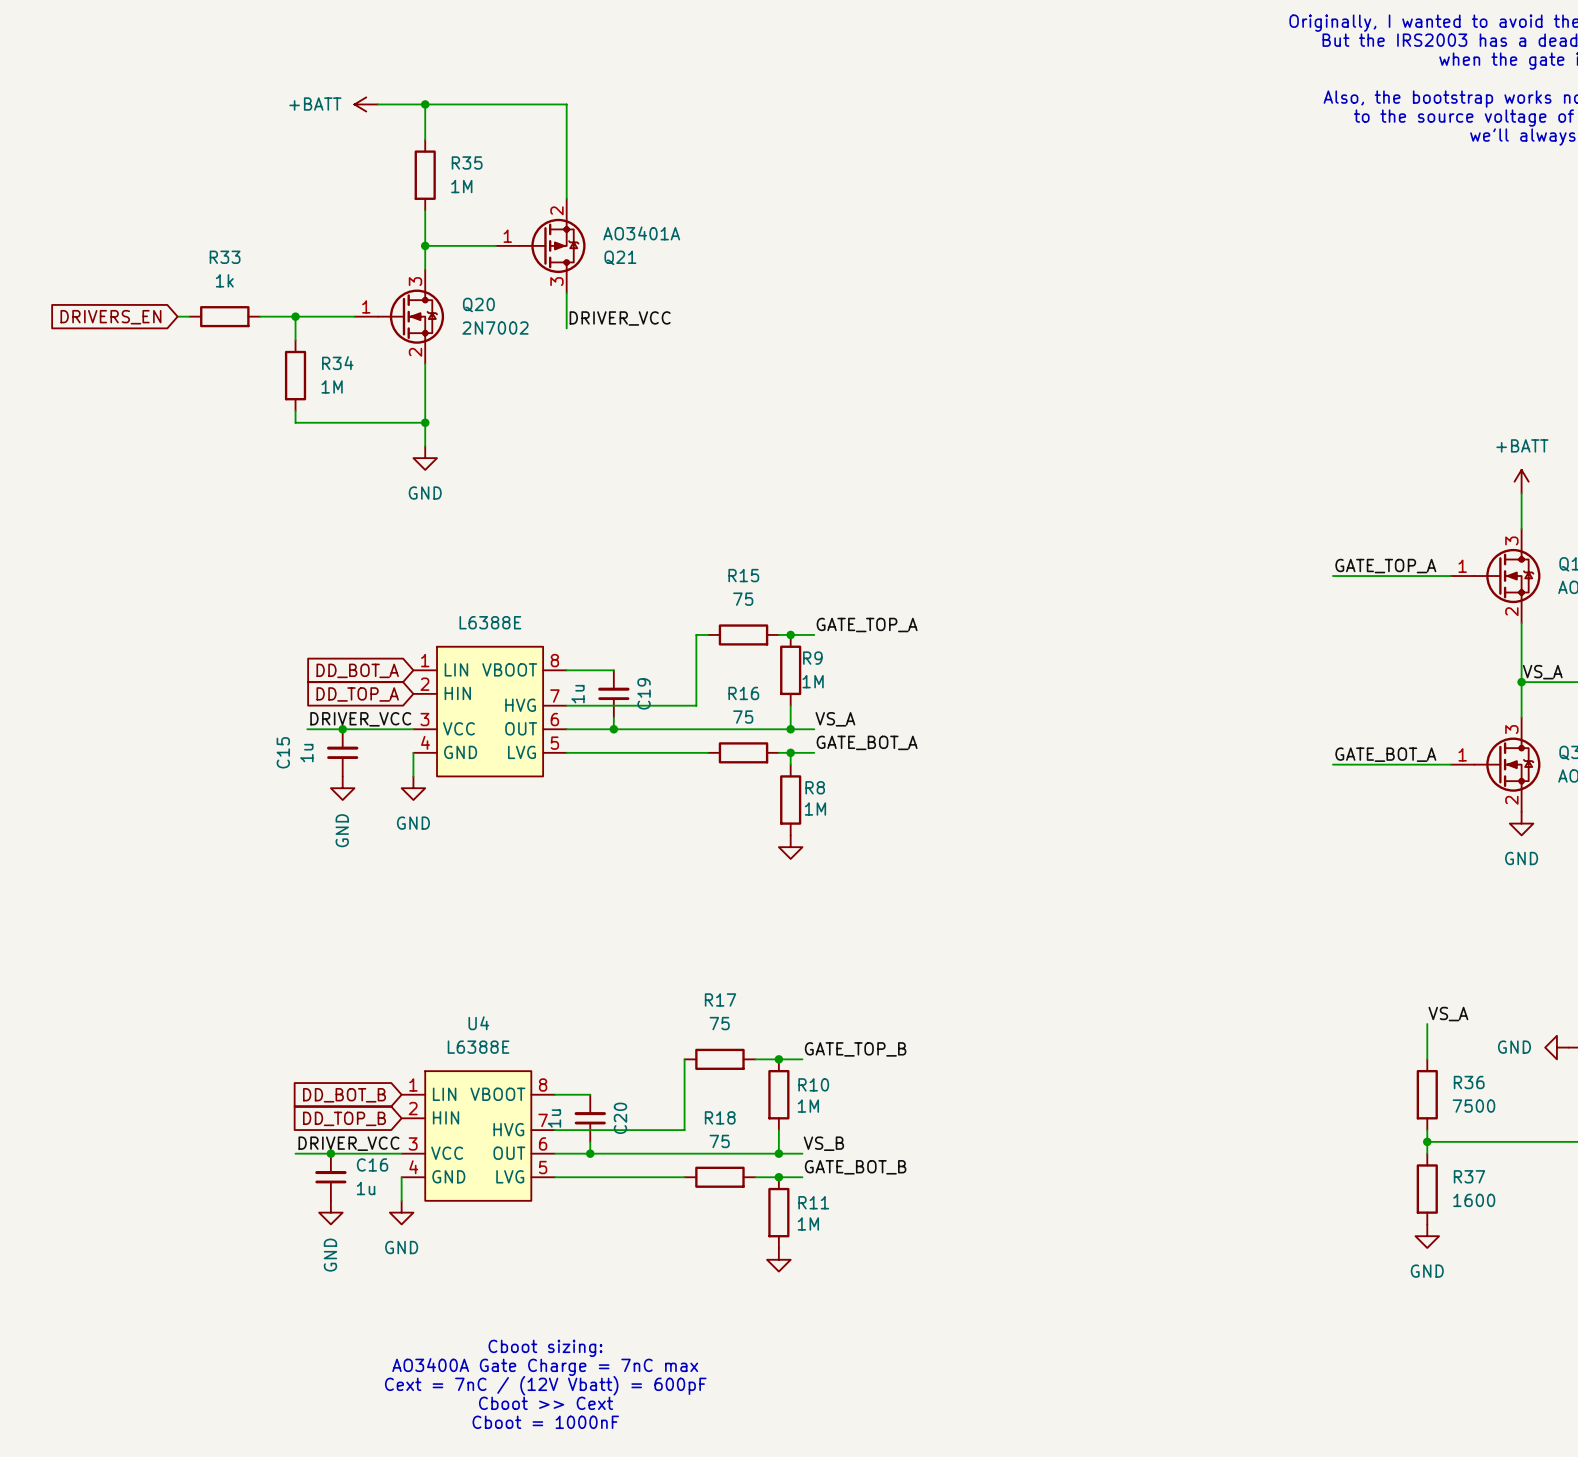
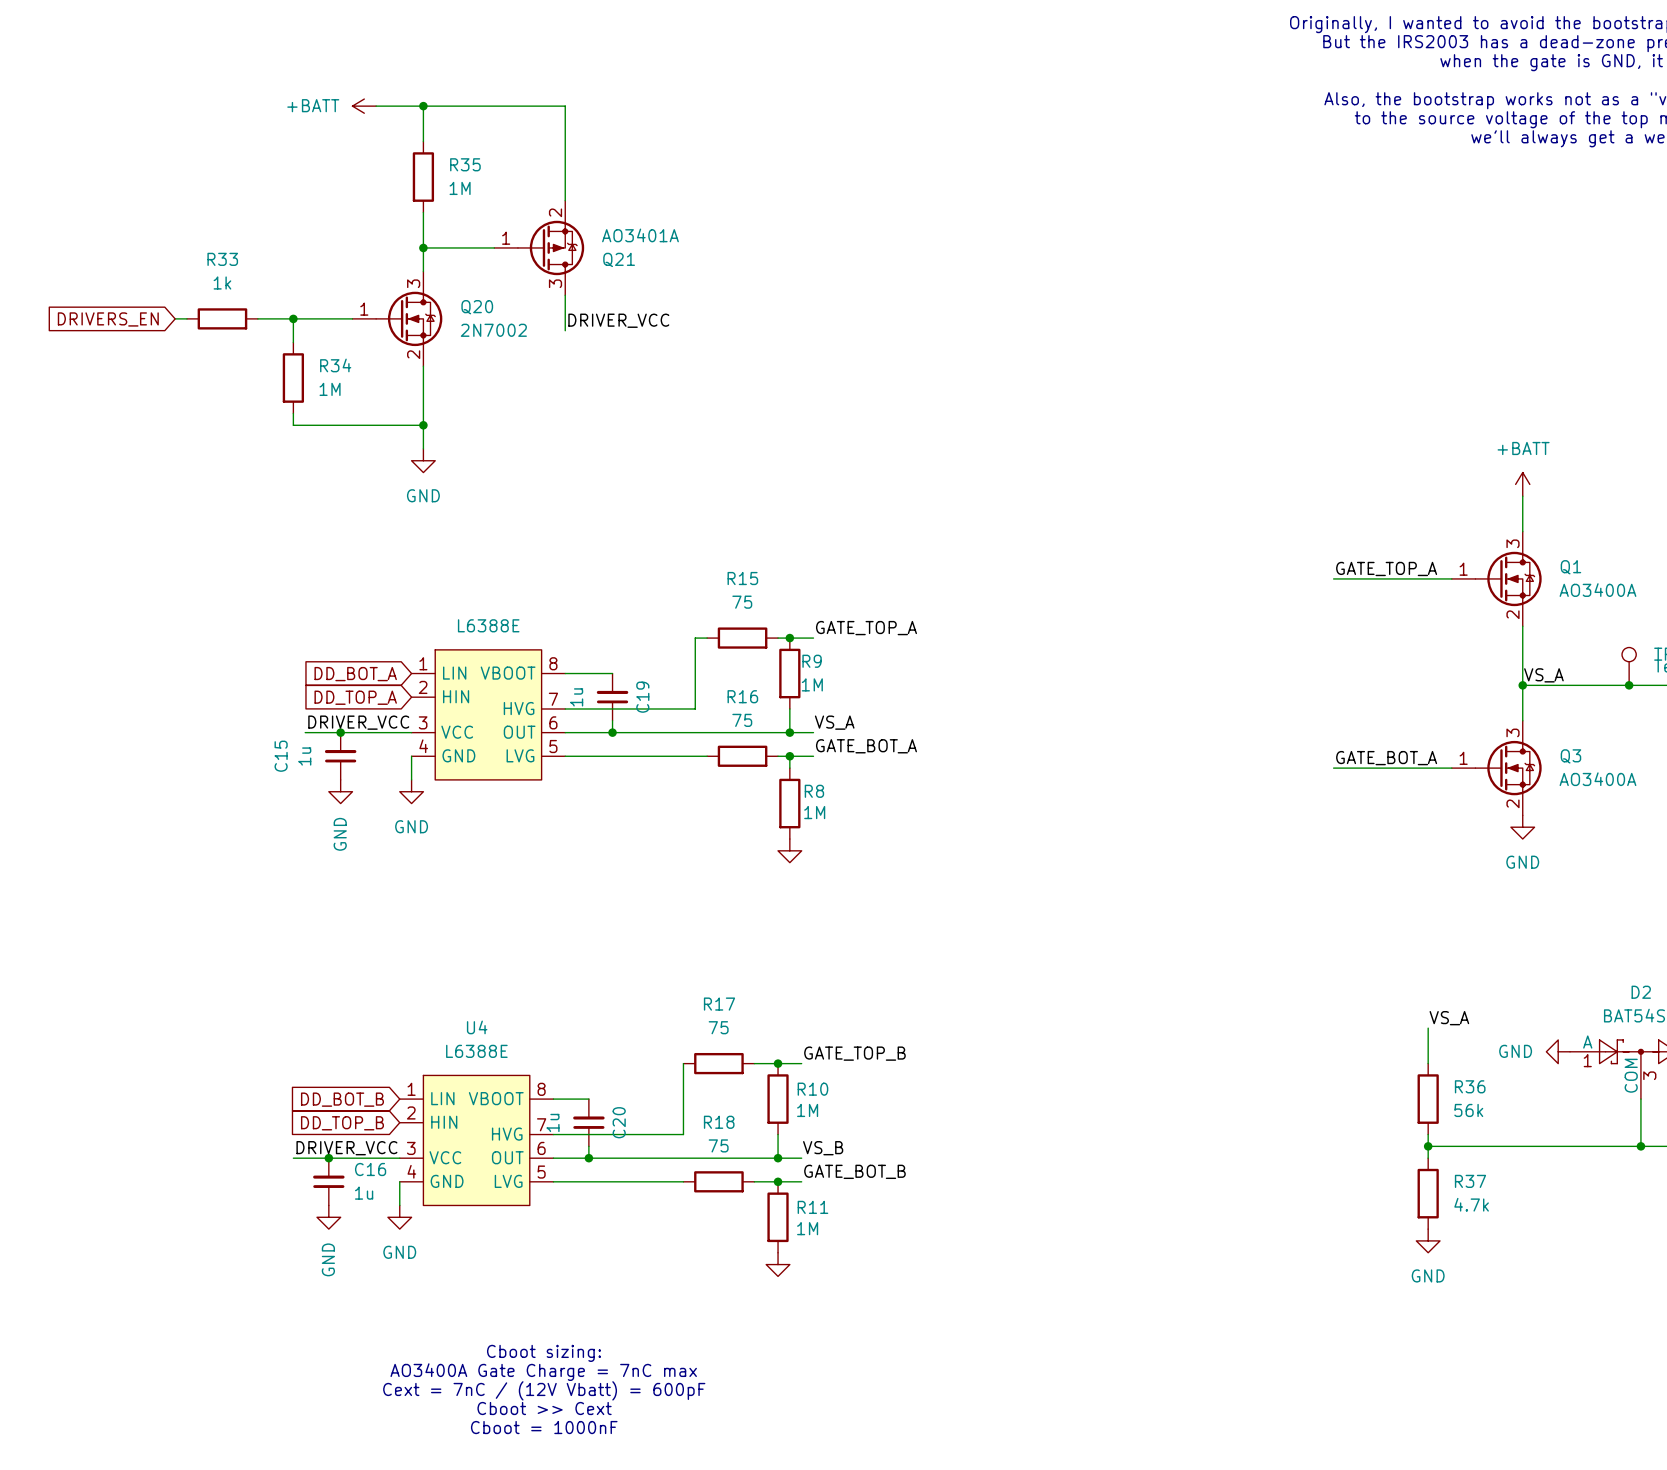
R36 value: 7500 (1473, 1106) -> 56k (1468, 1110)
R37 value: 1600 (1474, 1200) -> 4.7k (1471, 1204)

